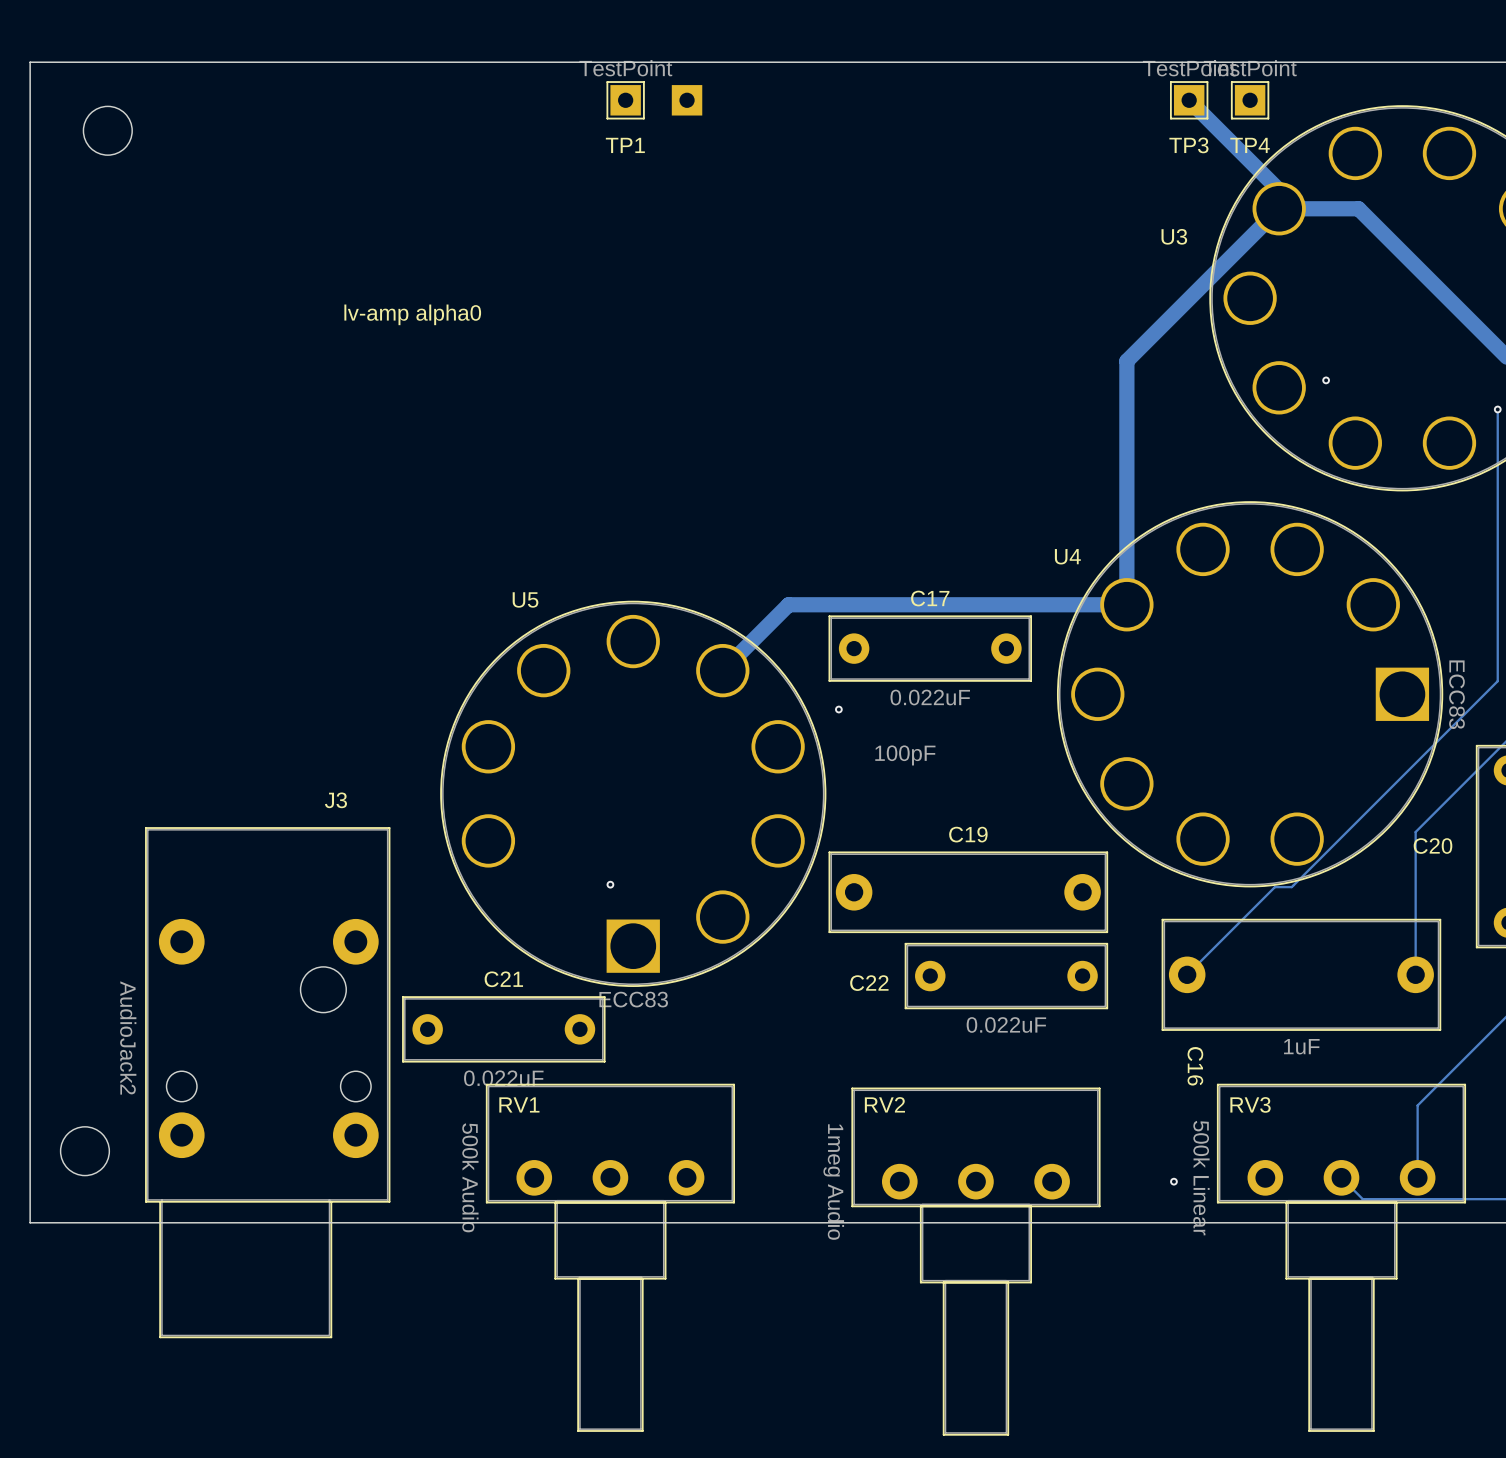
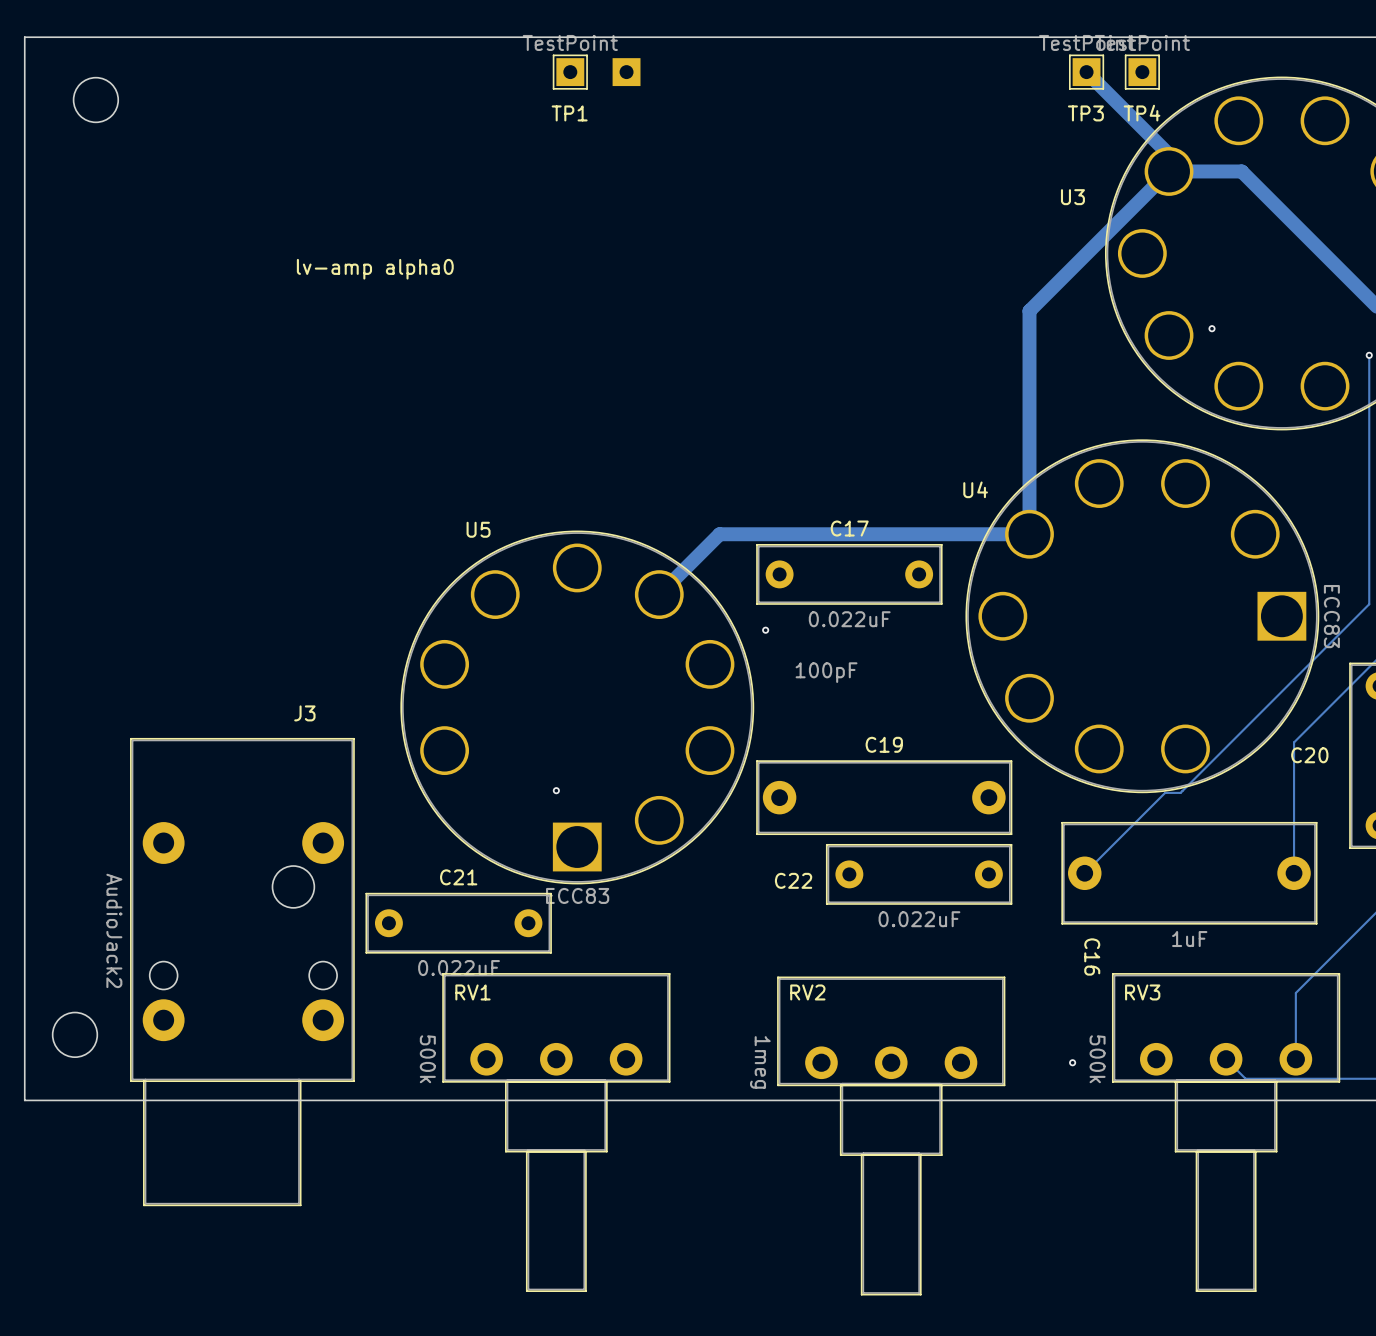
RV1 value: 500k Audio (470, 1177) -> 500k (427, 1059)
RV3 value: 500k Linear (1201, 1178) -> 500k (1097, 1059)
RV2 value: 1meg Audio (833, 1182) -> 1meg (760, 1062)

